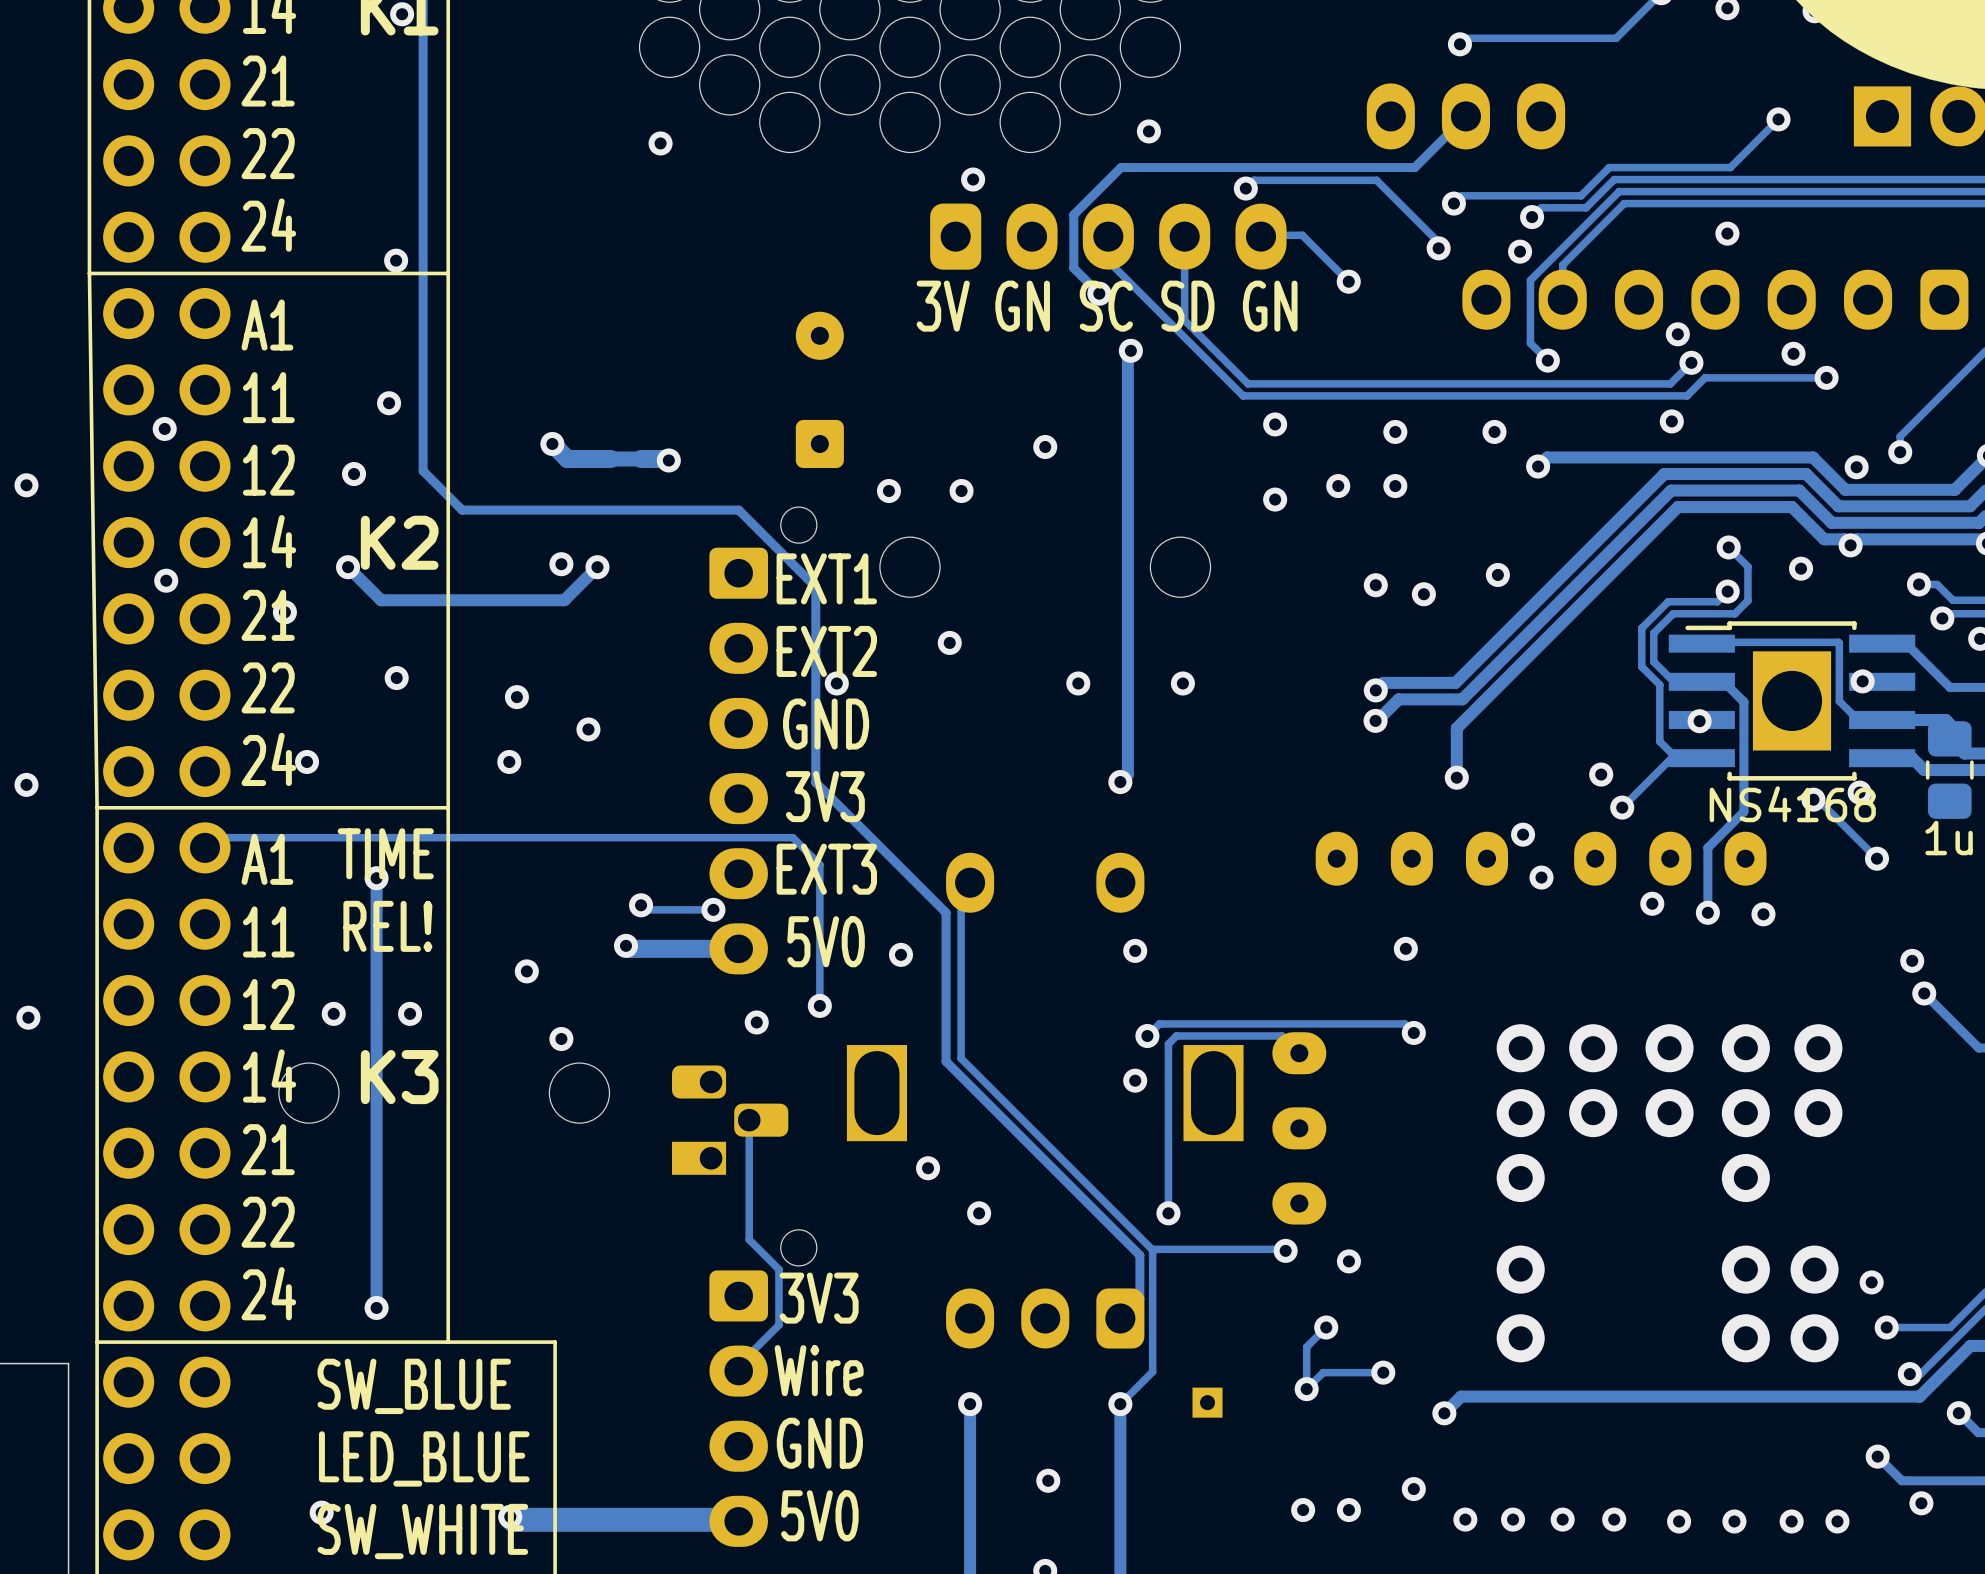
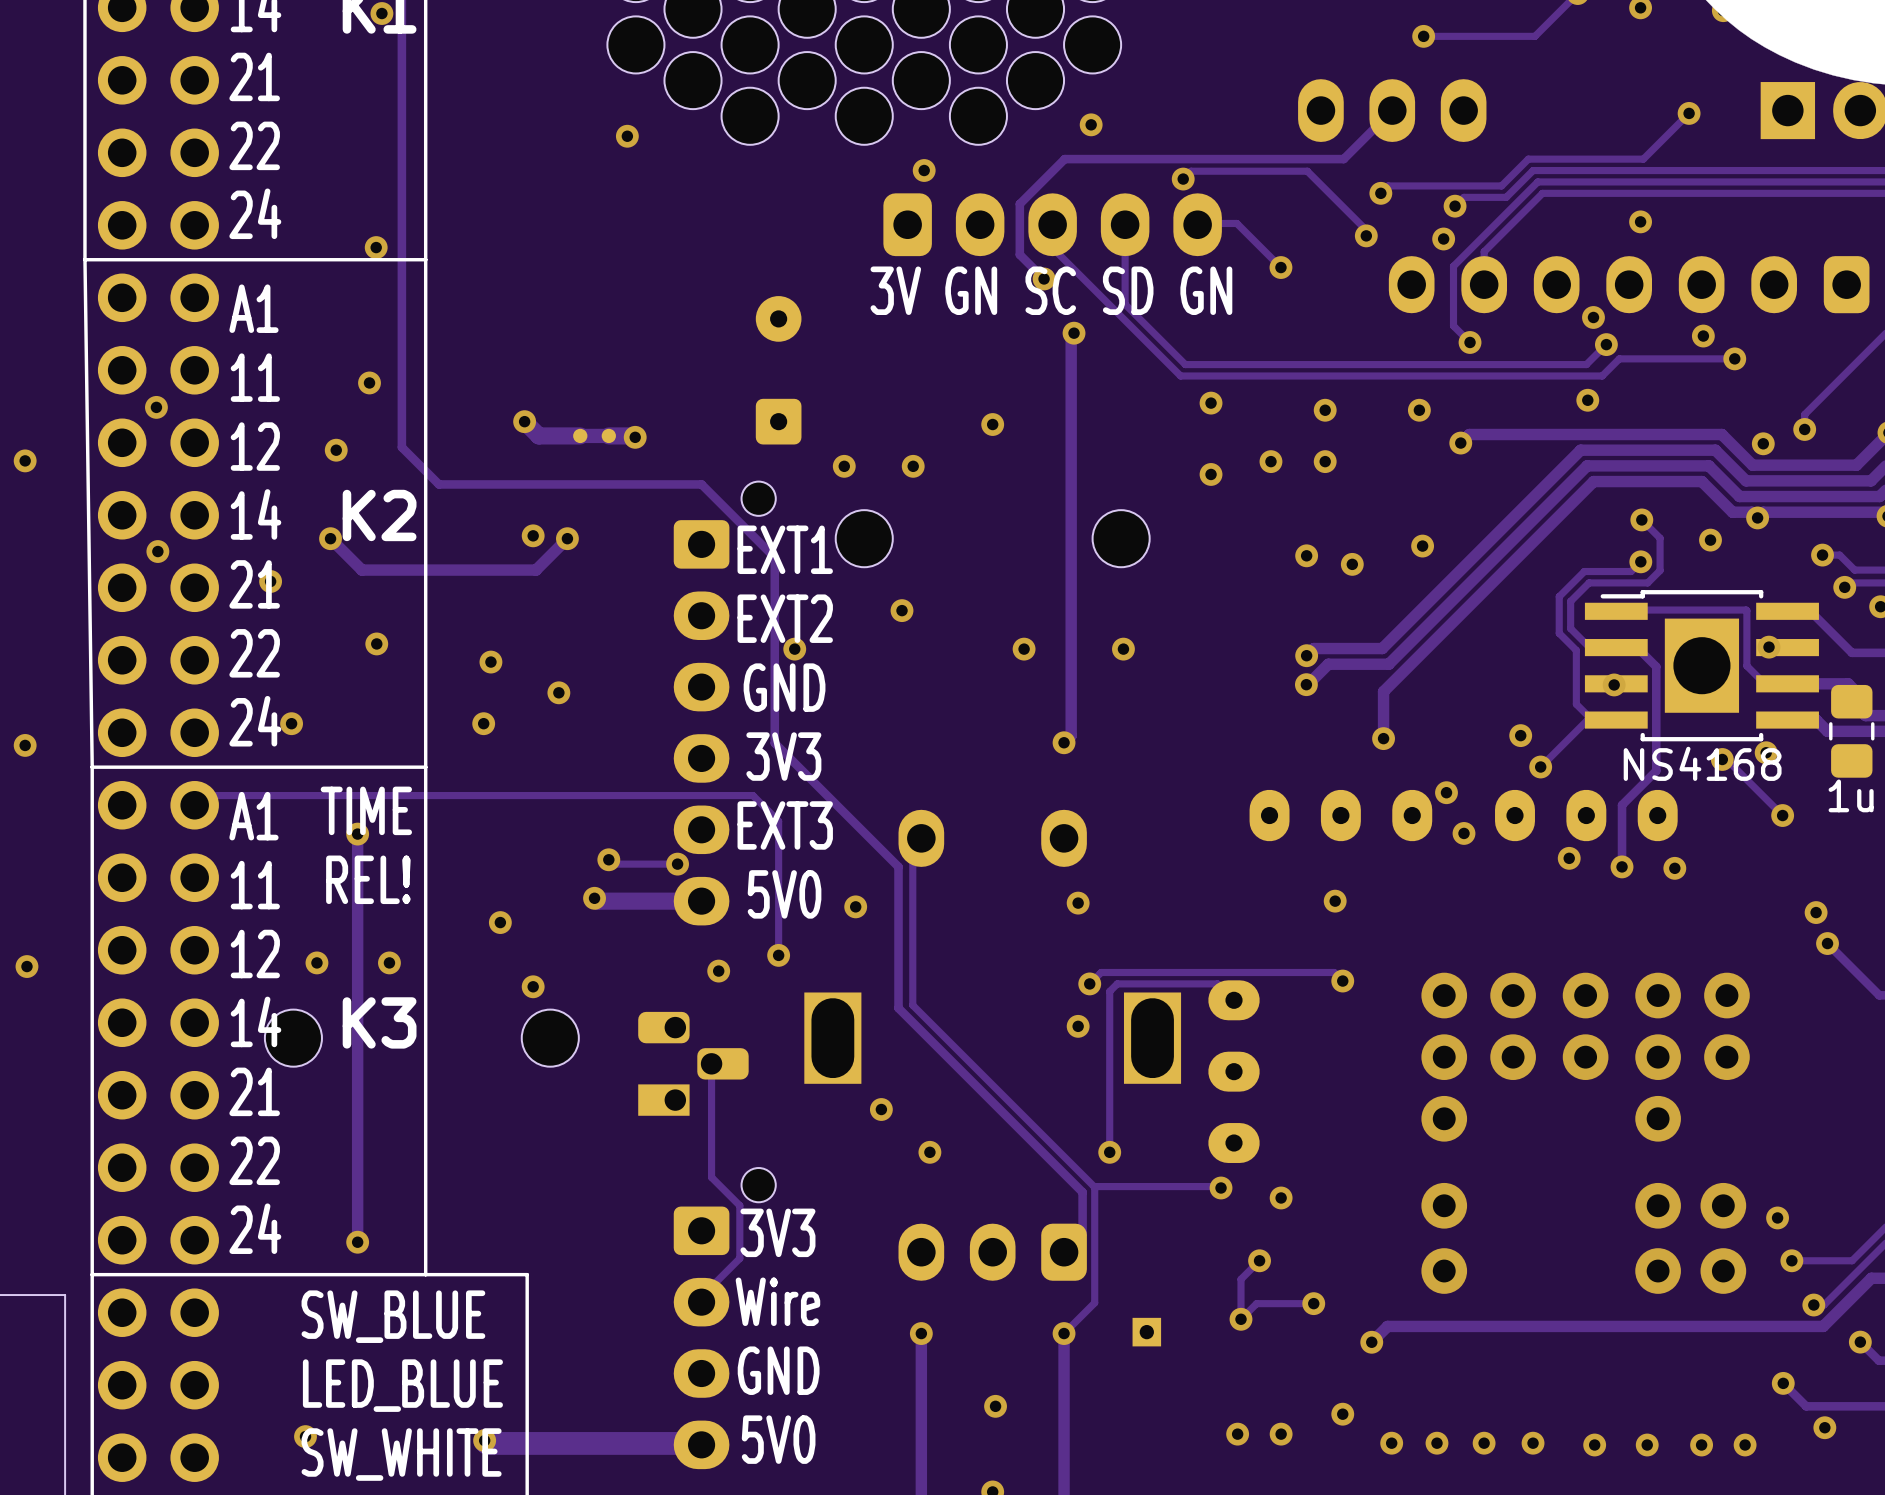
track: (1499, 38) (1465, 38) (1459, 44) -> none
via position: (1459, 44) -> (1423, 36)

